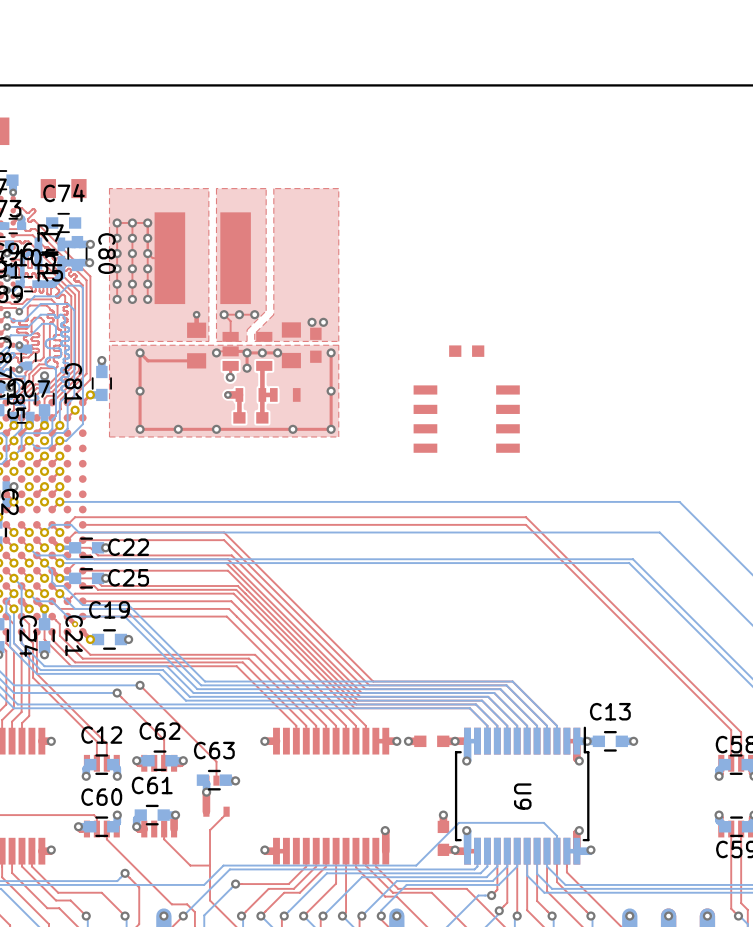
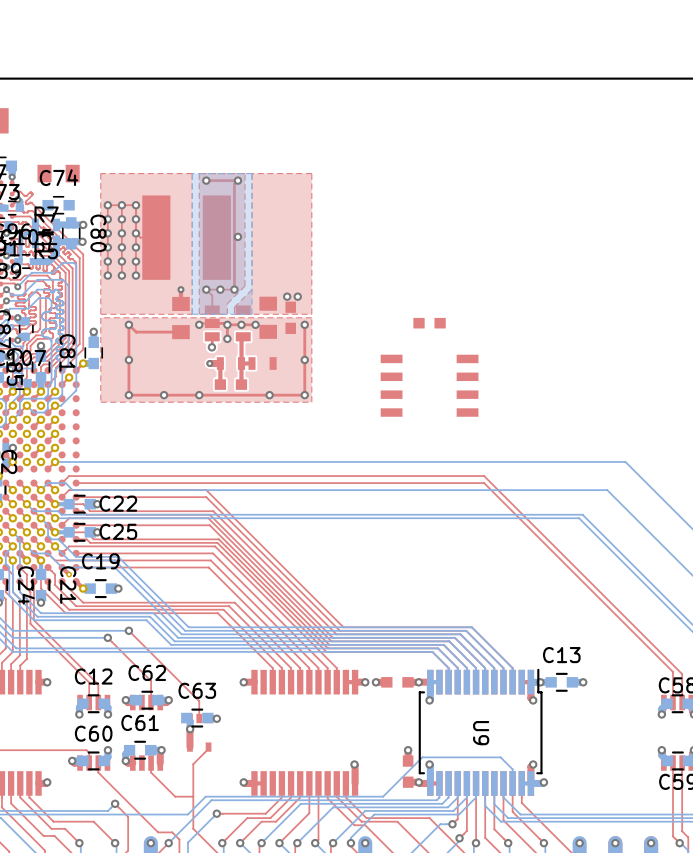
bottom zone outline: none -> (252, 173) (252, 314) (192, 314) (192, 173) (252, 173)
top track: none -> (206, 180) (237, 180) (234, 184) (234, 289)
via: none -> (206, 180)
via: none -> (237, 180)
via: none -> (237, 236)

